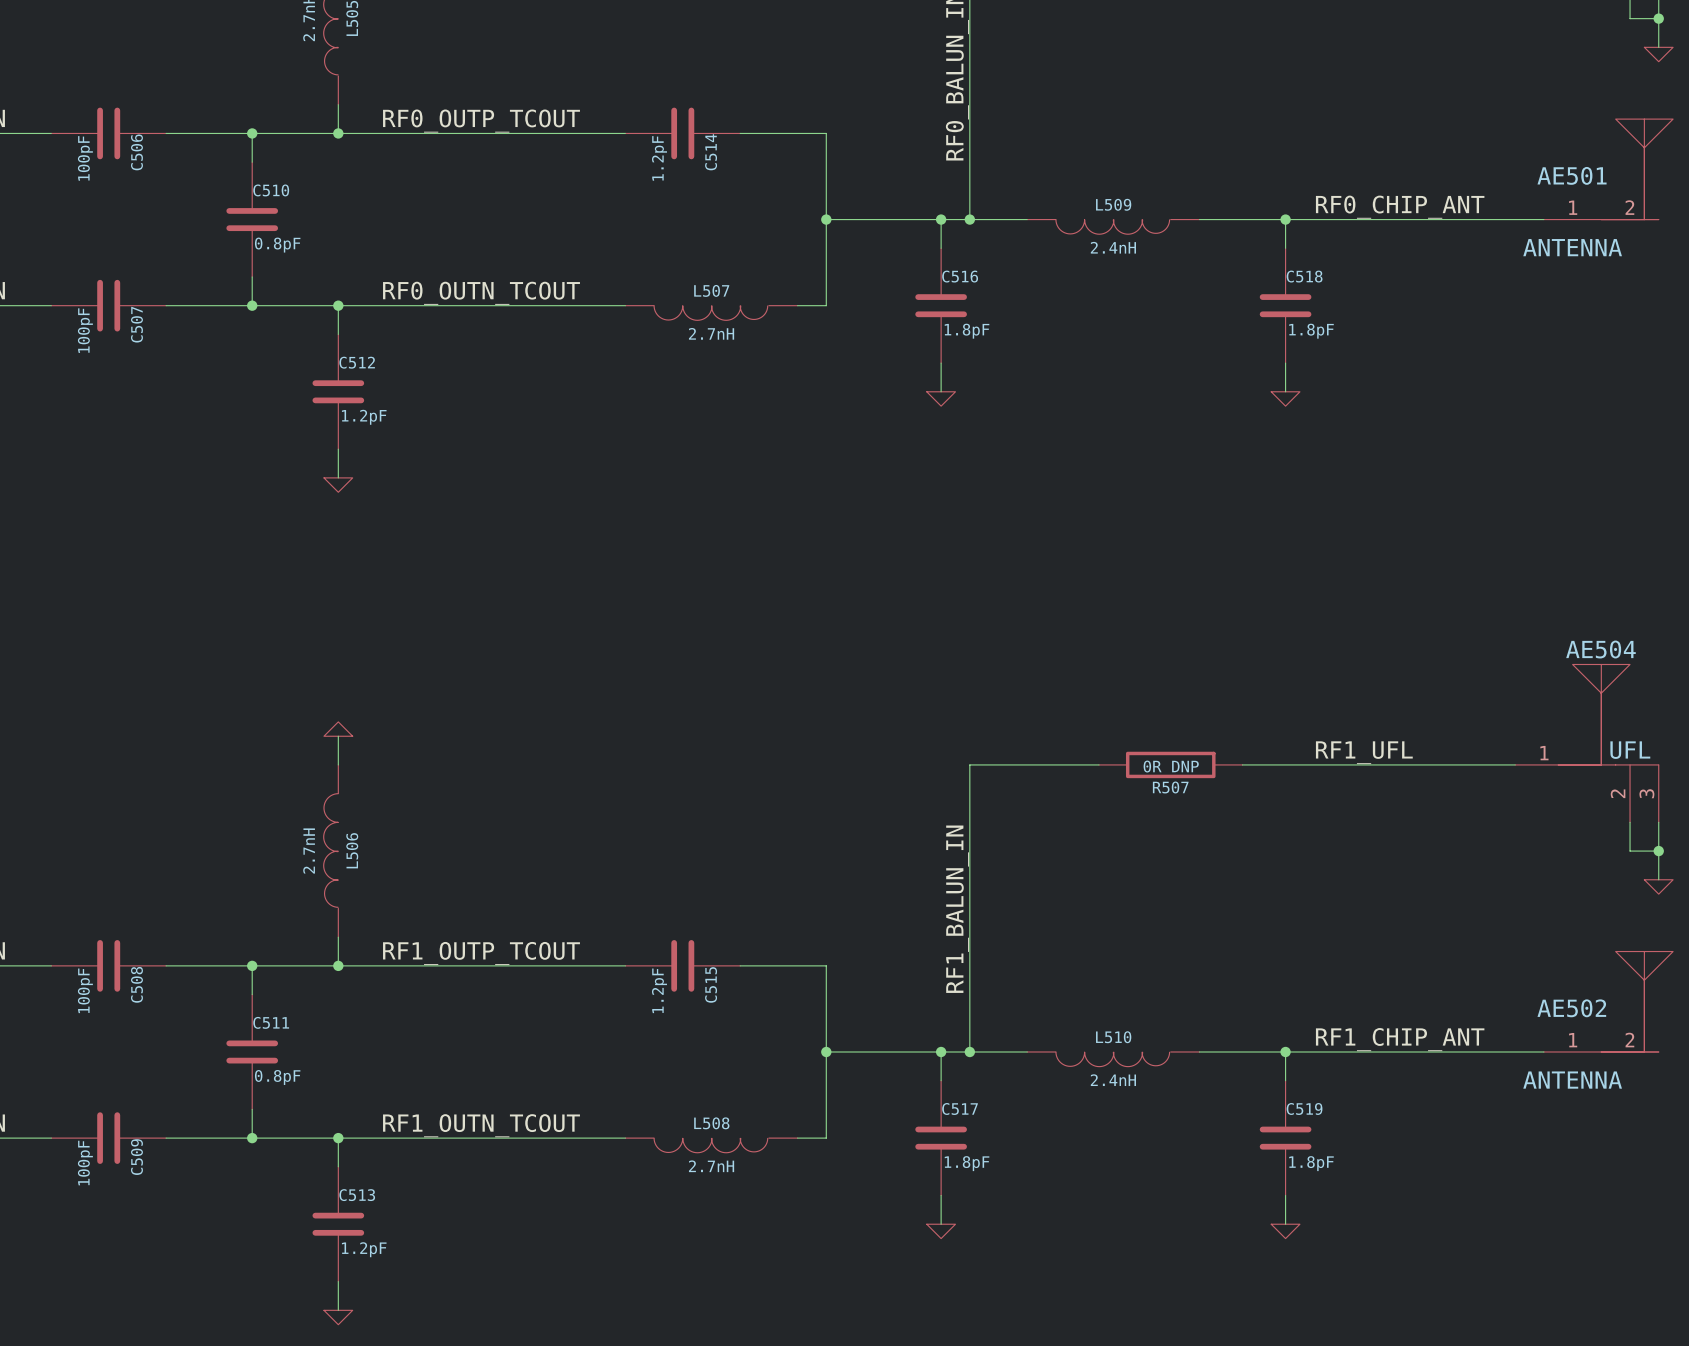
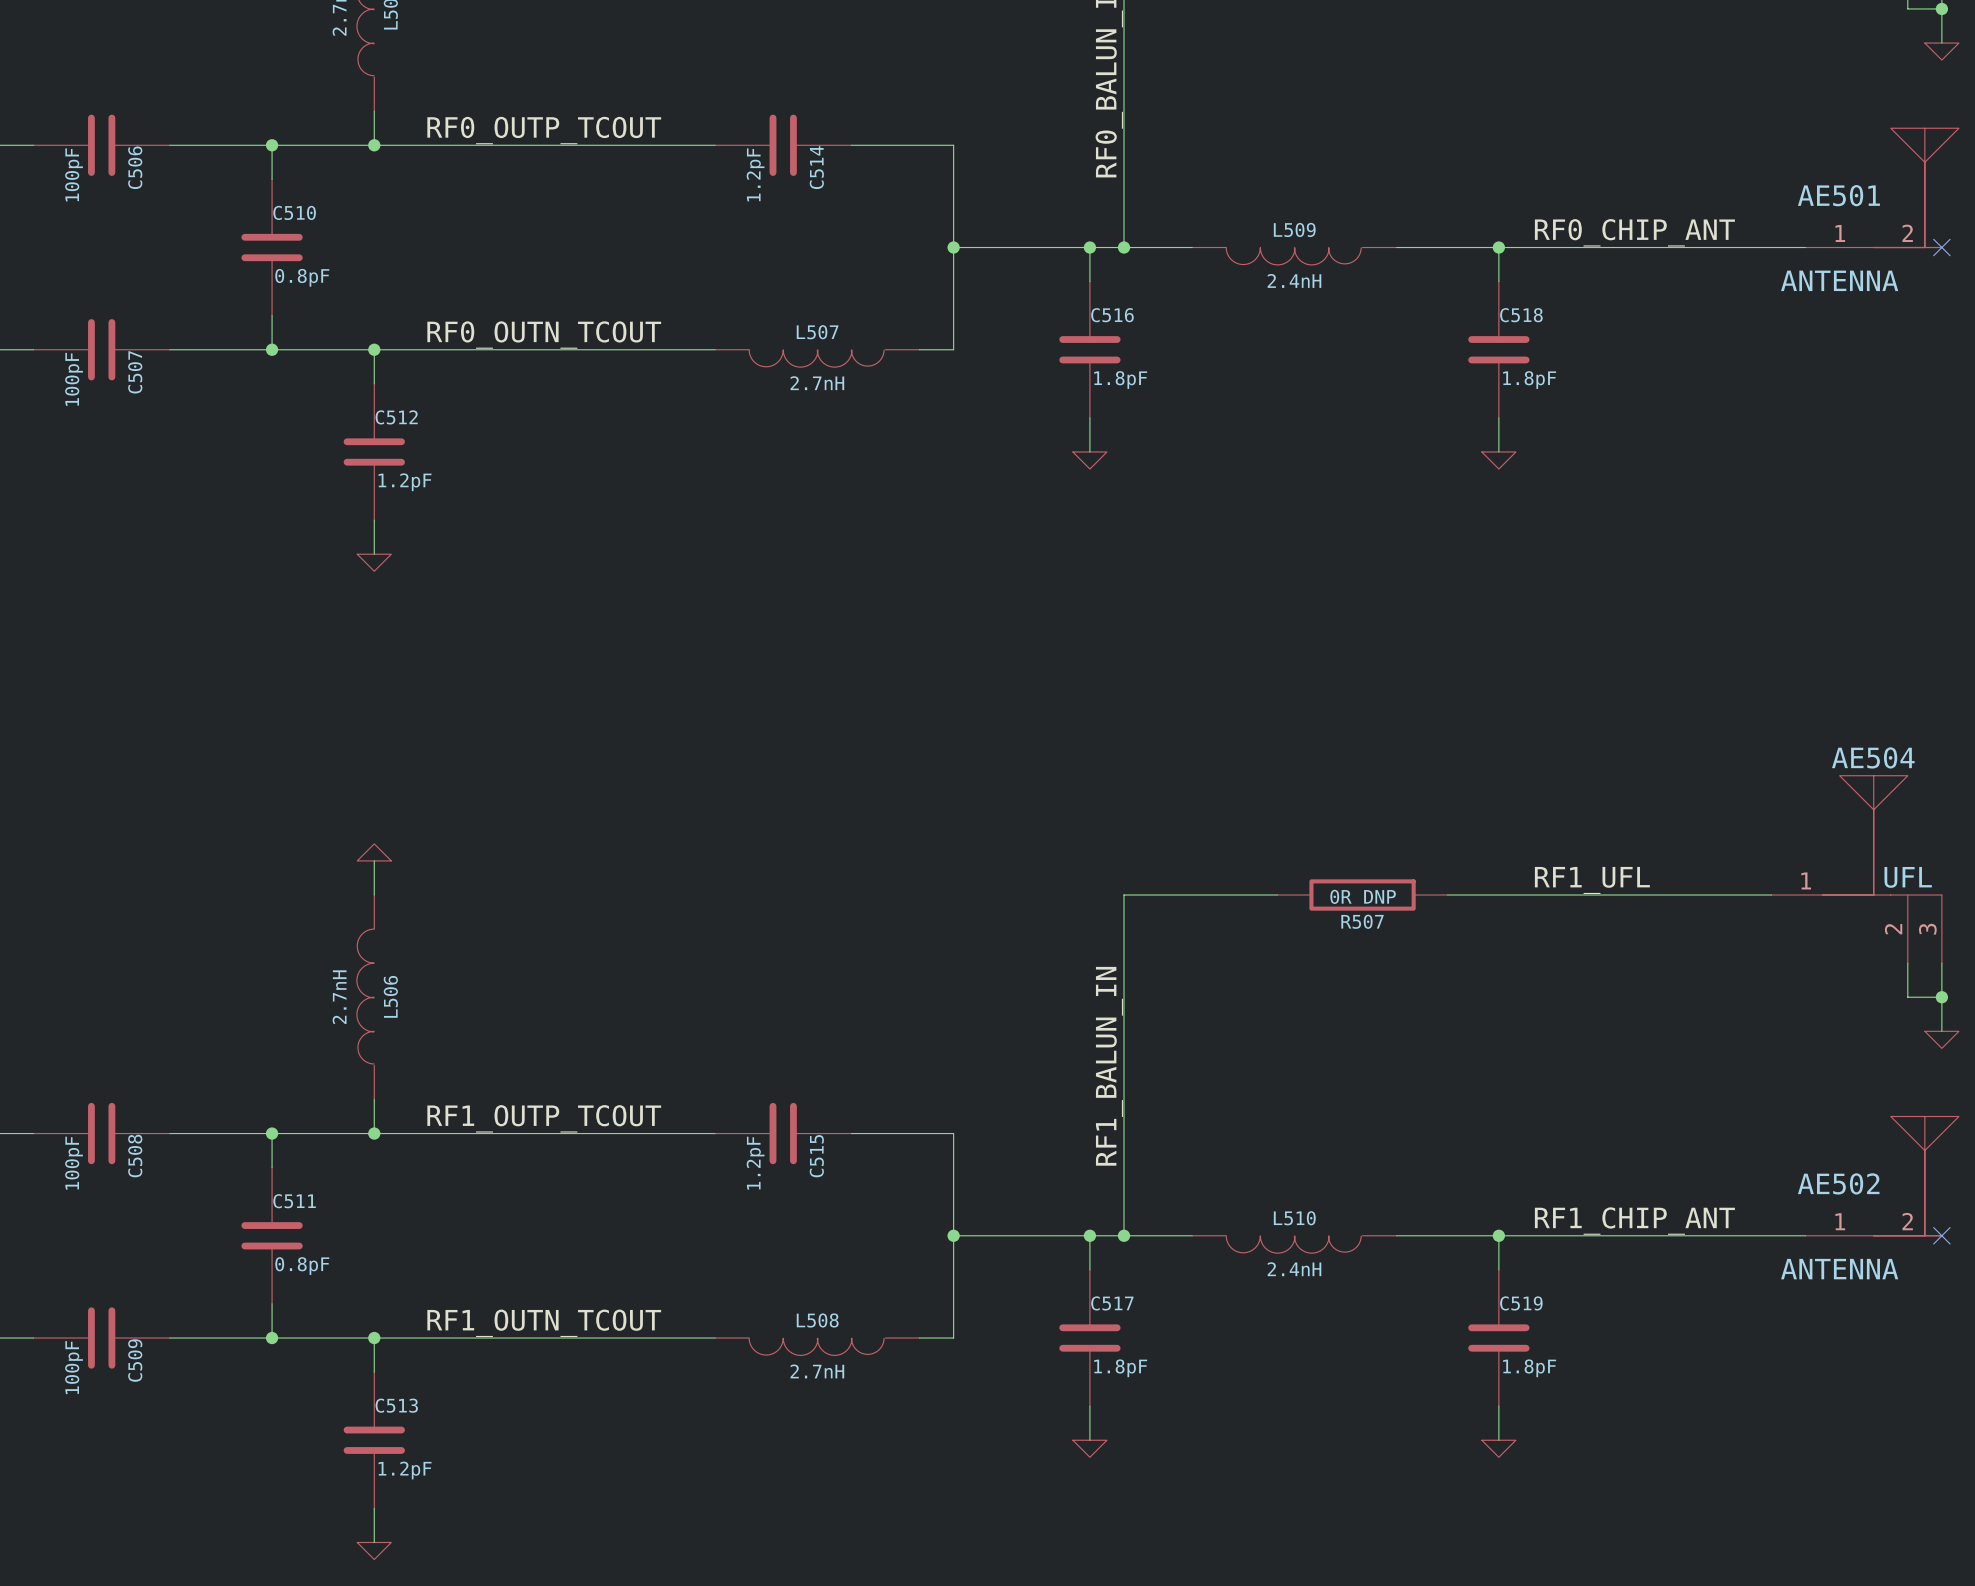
no-connect mark: none -> (1941, 247)
no-connect mark: none -> (1941, 1235)

